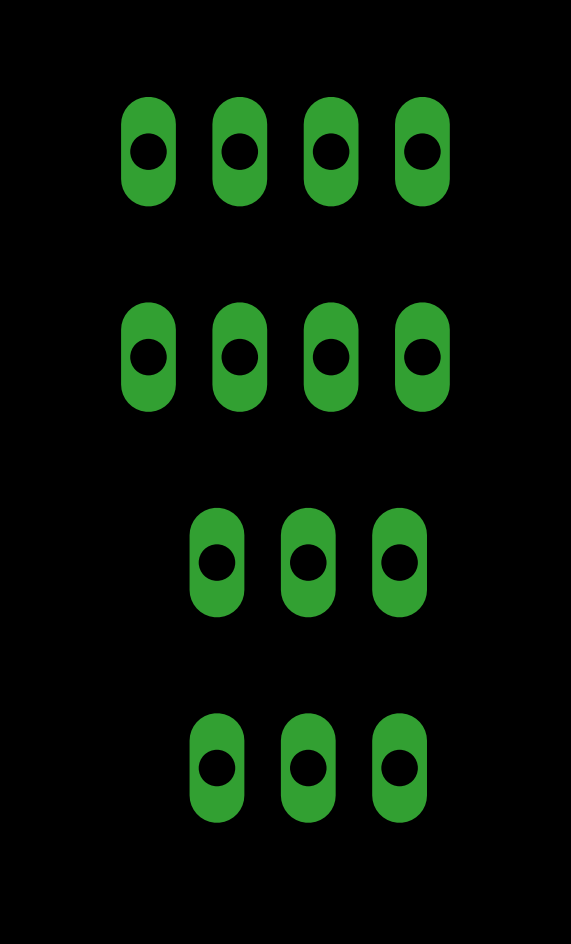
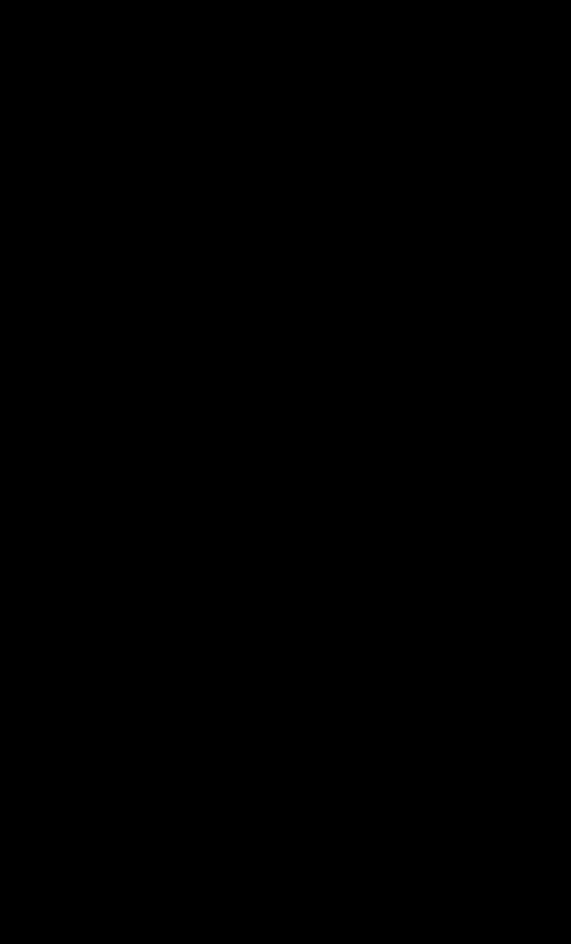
part: (285, 151) -> none
part: (285, 357) -> none
part: (308, 562) -> none
part: (308, 768) -> none

